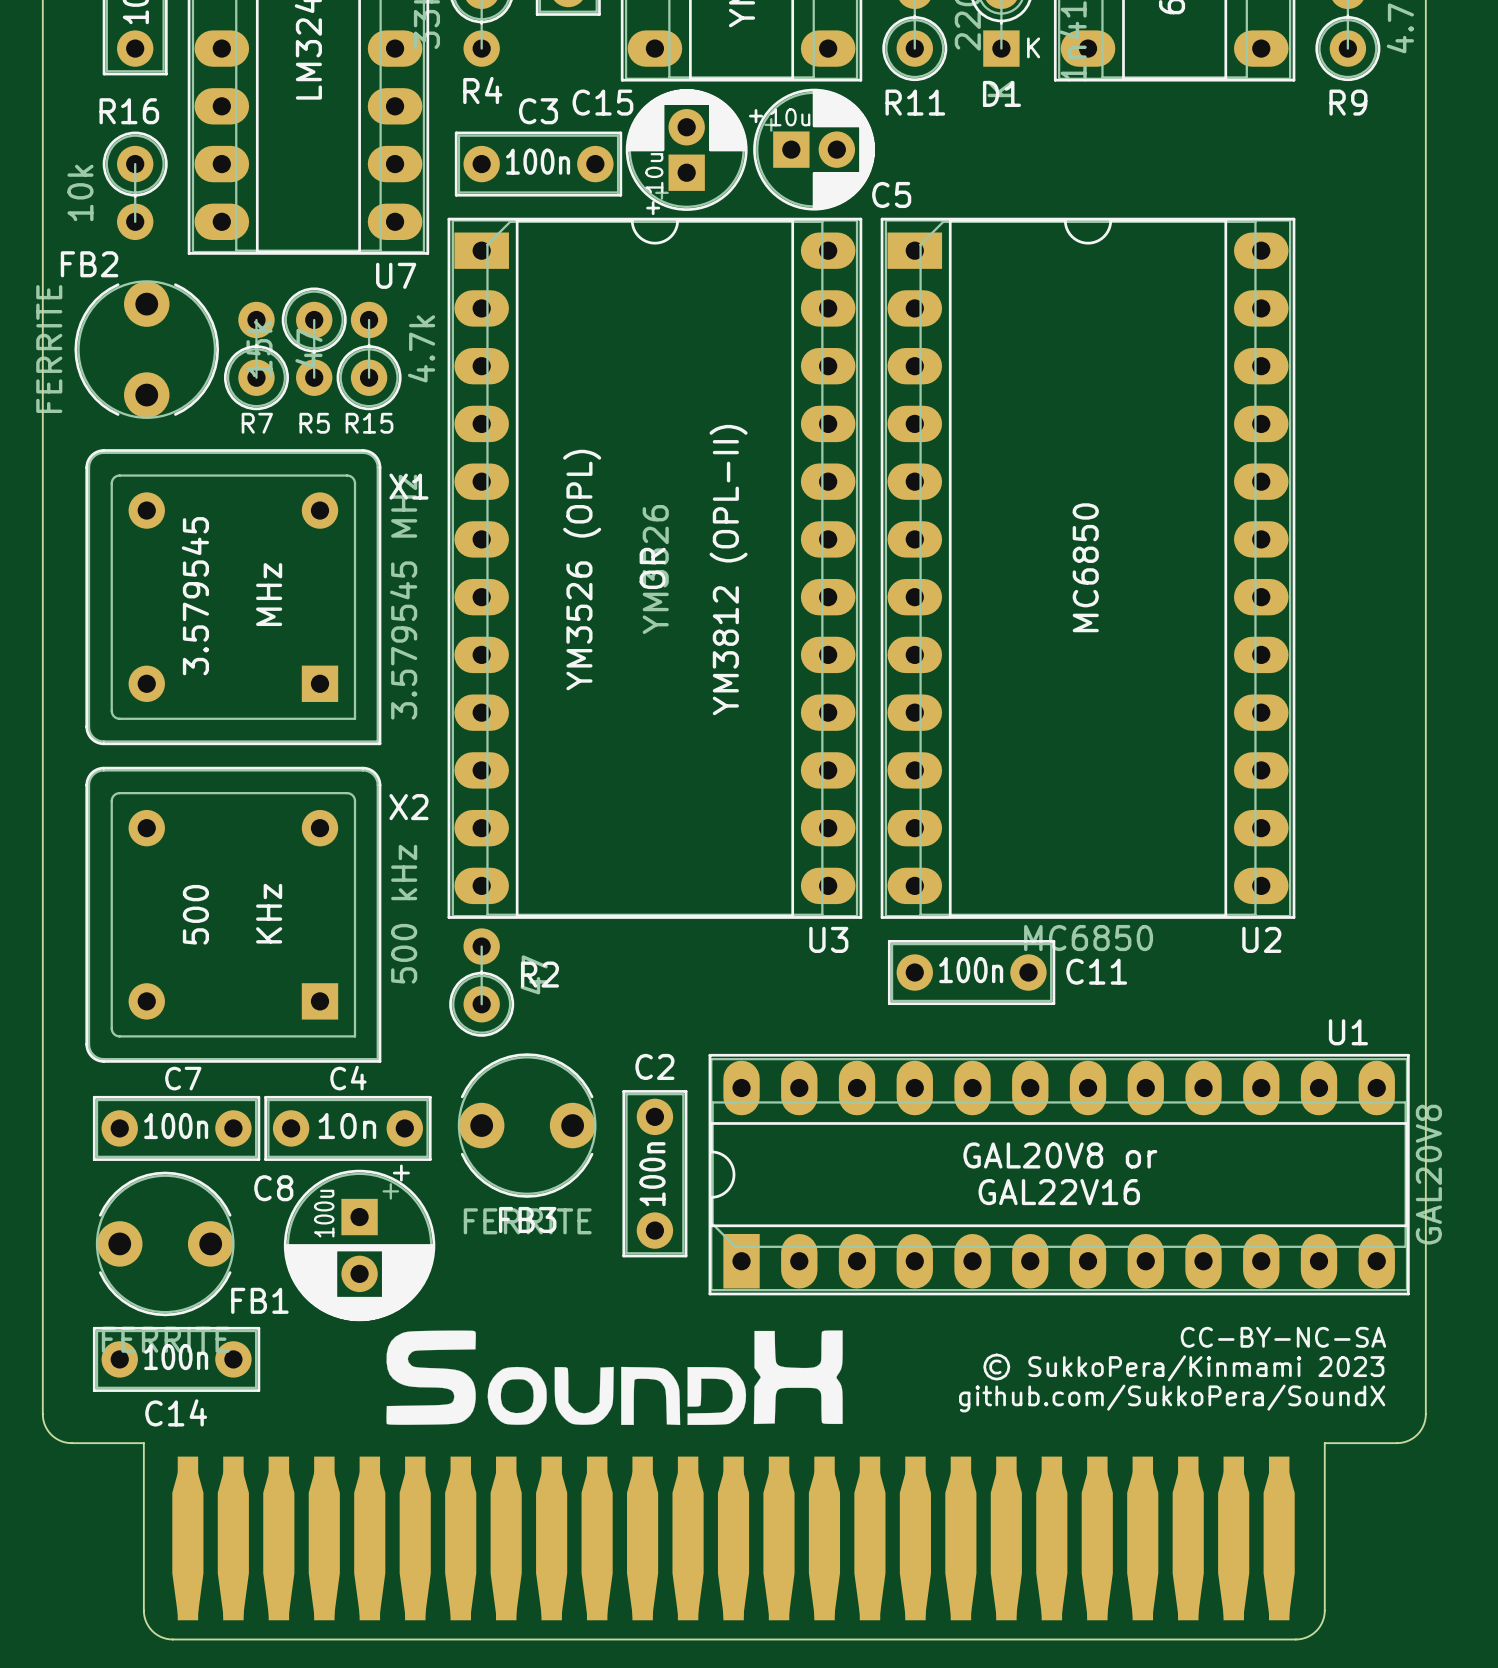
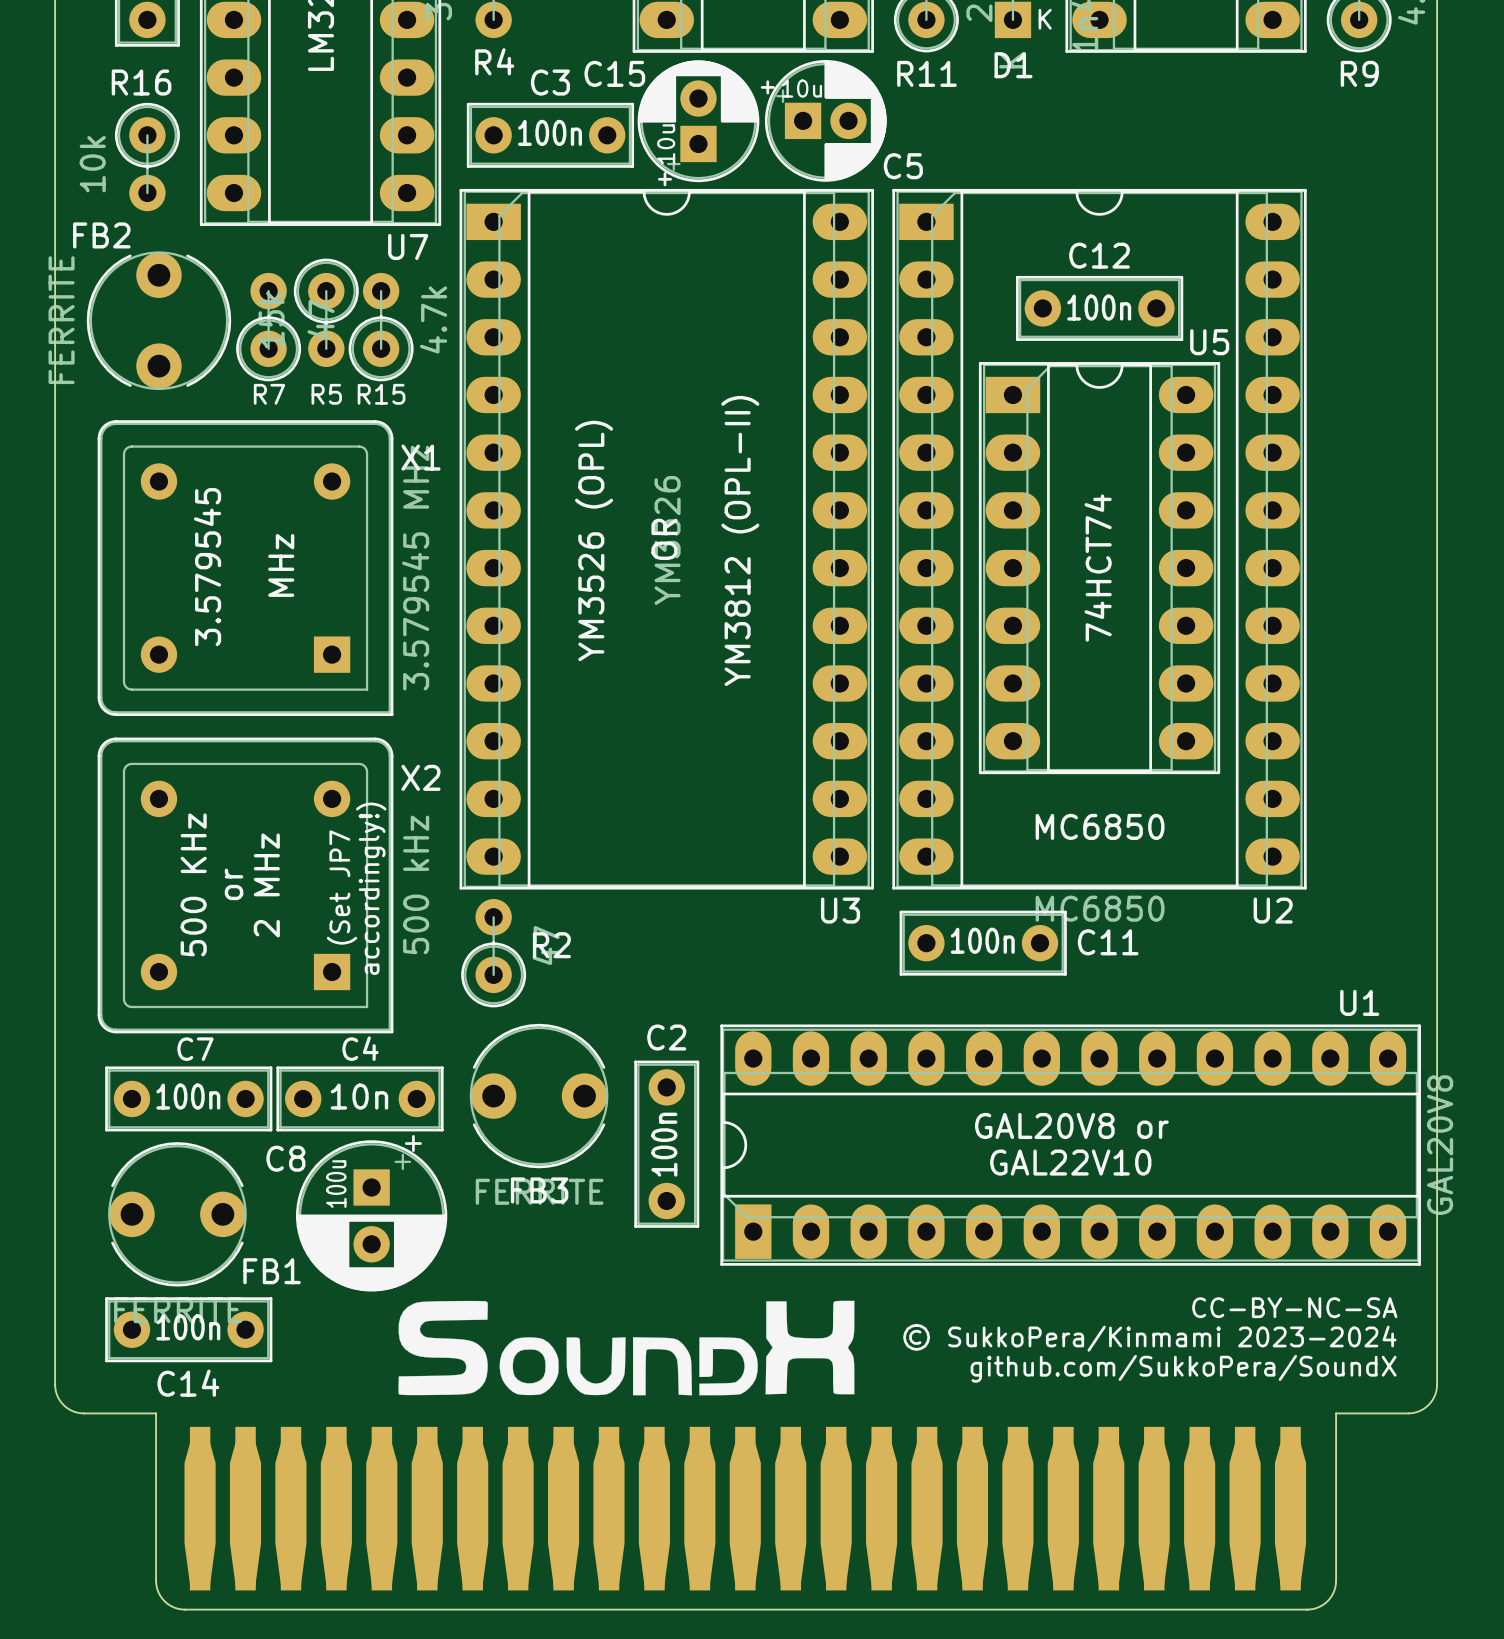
C12: none -> 100n (1099, 308)
text rotation: 0° (1085, 567) -> 90° clockwise (1100, 826)
text position: MC6850 (1085, 567) -> MC6850 (1100, 826)
U5: none -> 74HCT74 (1099, 568)
text: none -> or (234, 884)
text: KHz (269, 913) -> 2 MHz (266, 885)
text: none -> 500 KHz (193, 884)
text: 500 (195, 914) -> none
text: none -> (Set JP7 (342, 887)
text: none -> accordingly!) (371, 888)
text: GAL22V16 (1059, 1192) -> GAL22V10 (1070, 1162)
text: © SukkoPera/Kinmami 2023 (1183, 1367) -> © SukkoPera/Kinmami 2023-2024 (1149, 1337)

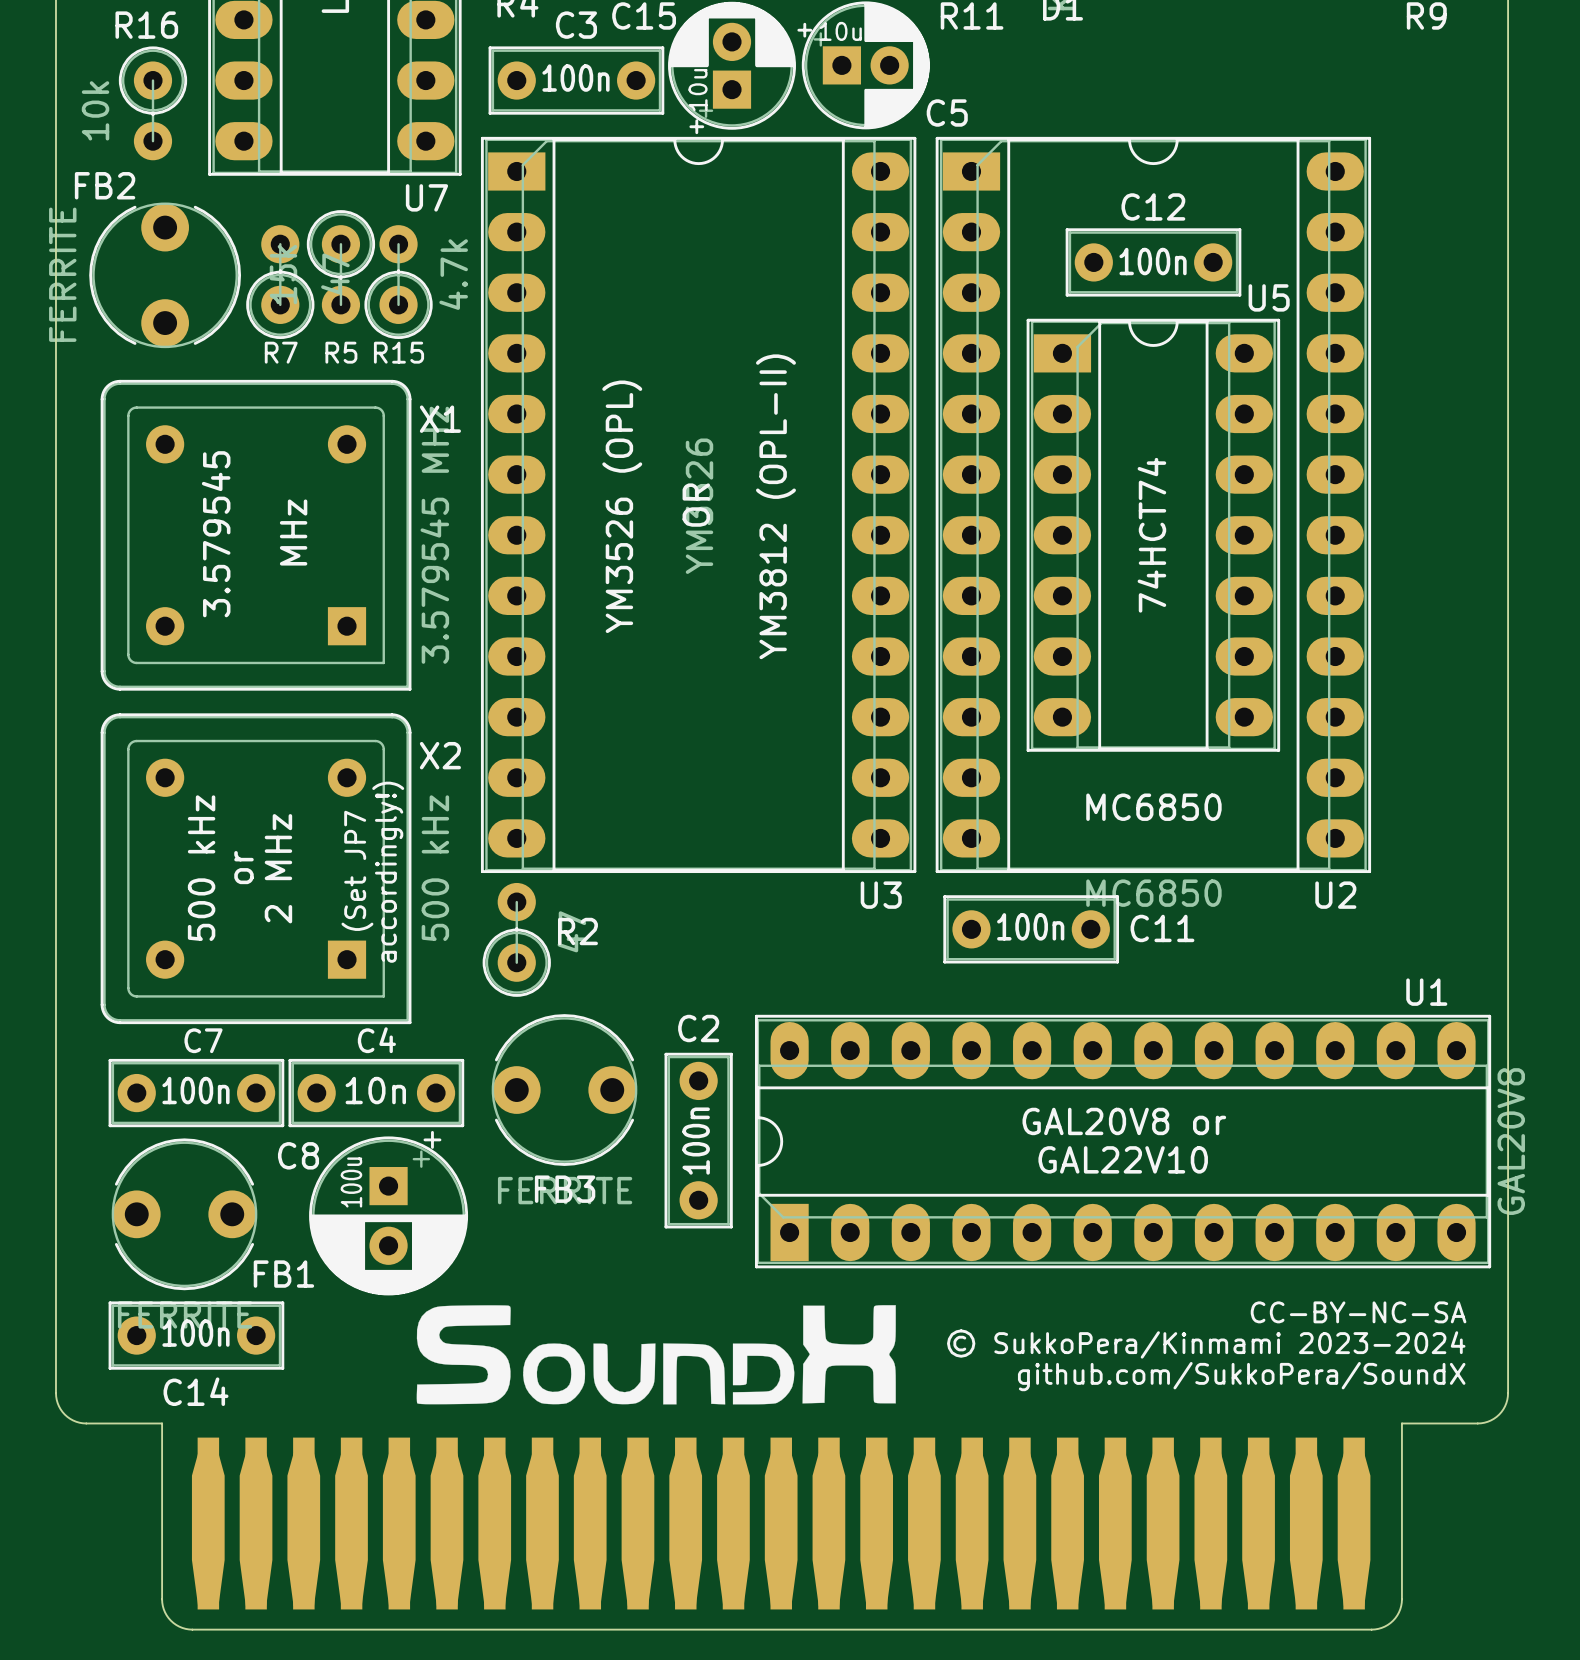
text: 500 KHz (193, 884) -> 500 kHz (201, 868)

